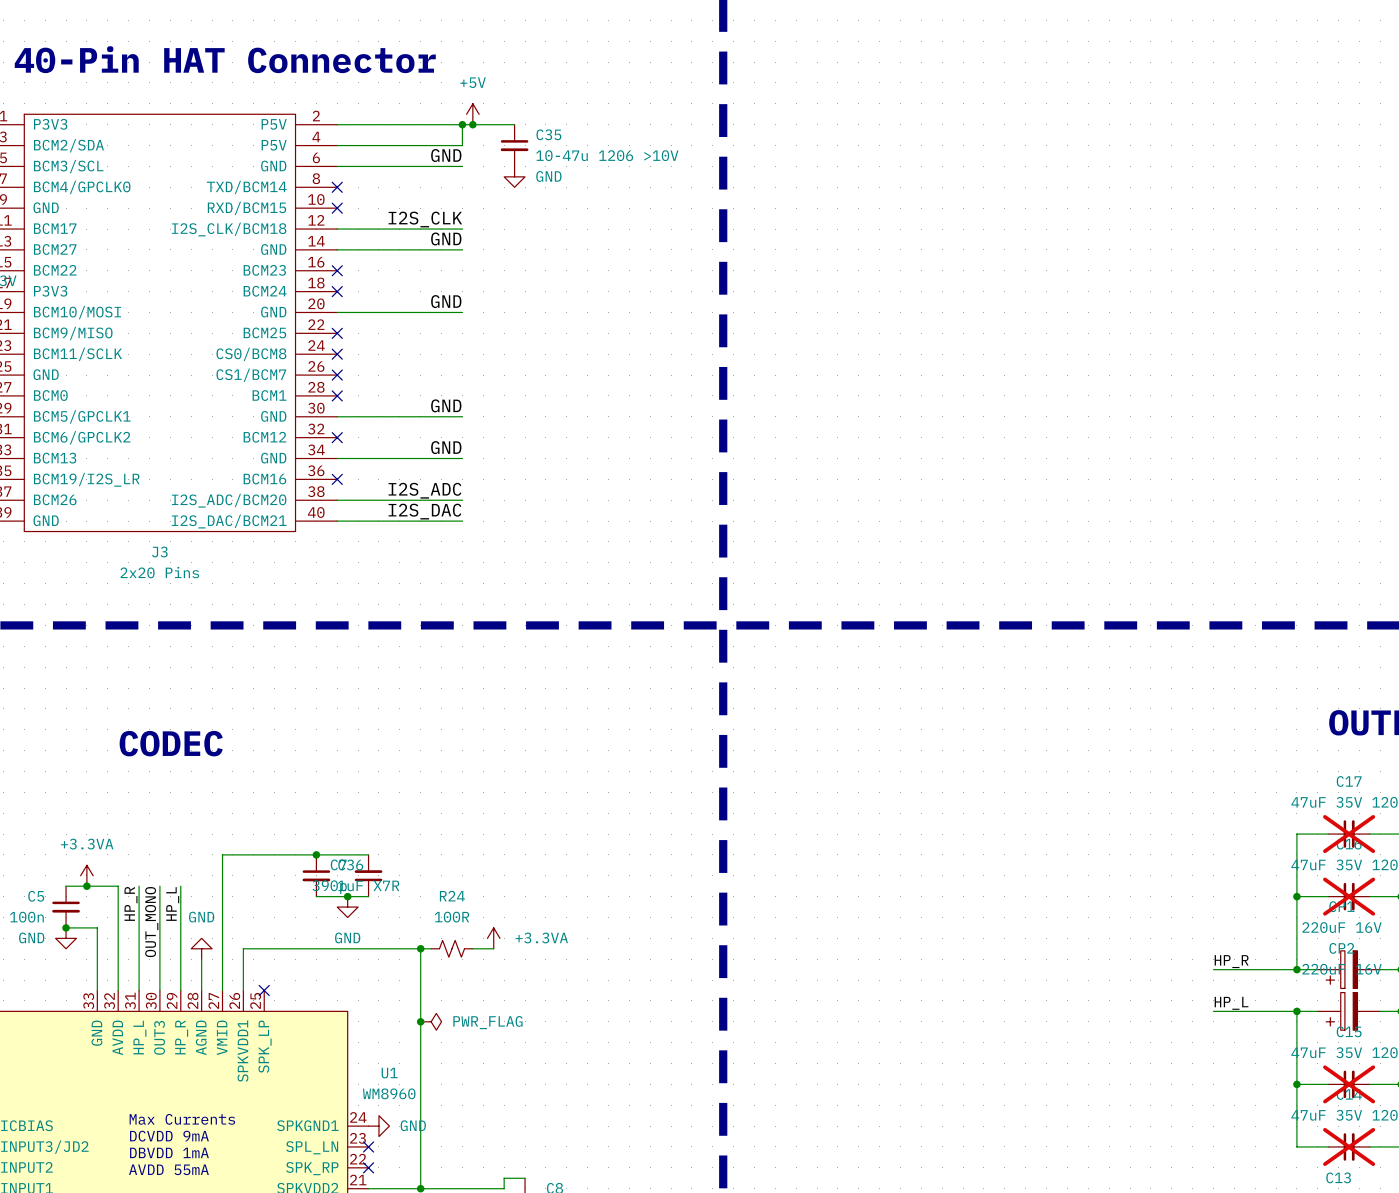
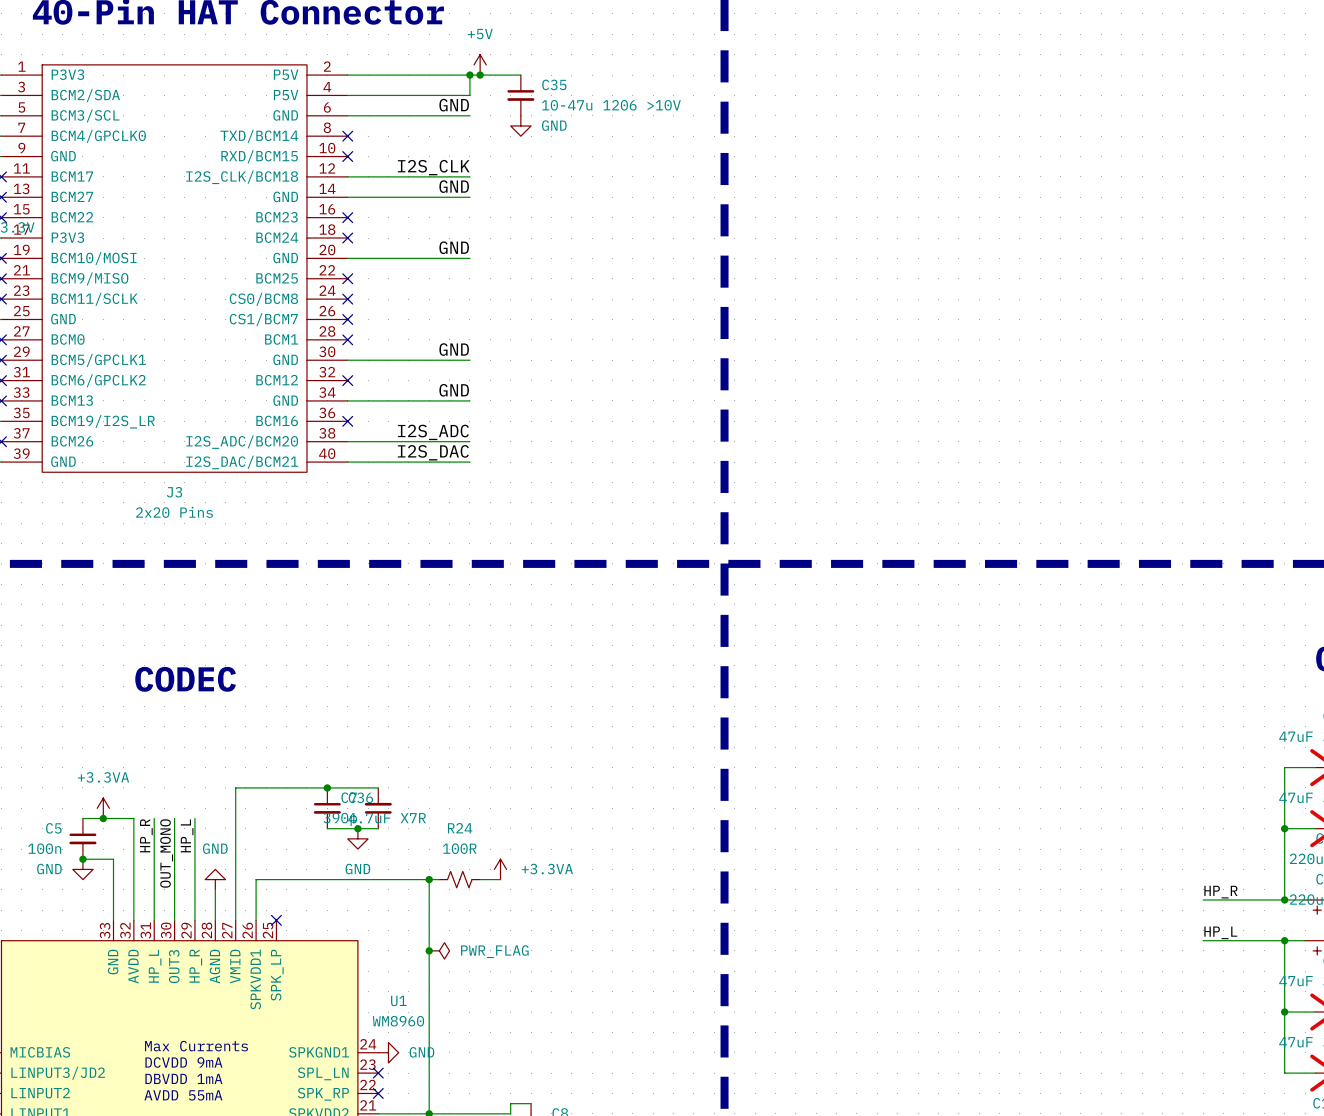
C36 value: 1uF X7R (368, 885) -> 4.7uF X7R (387, 818)

